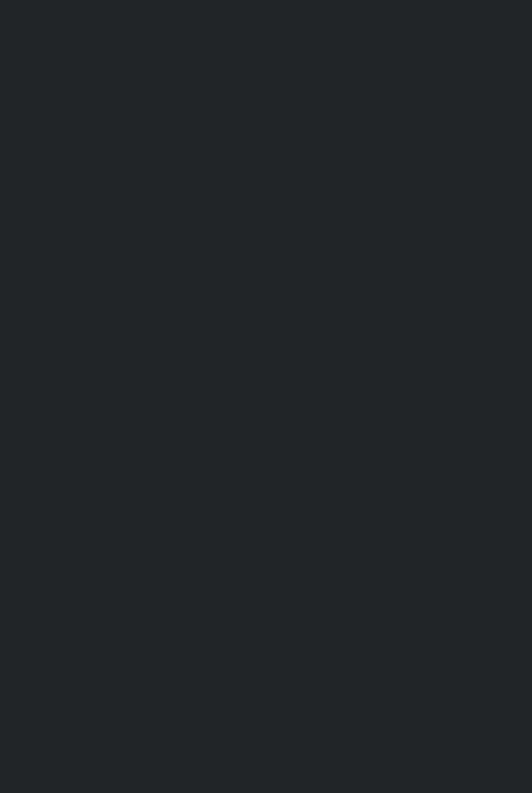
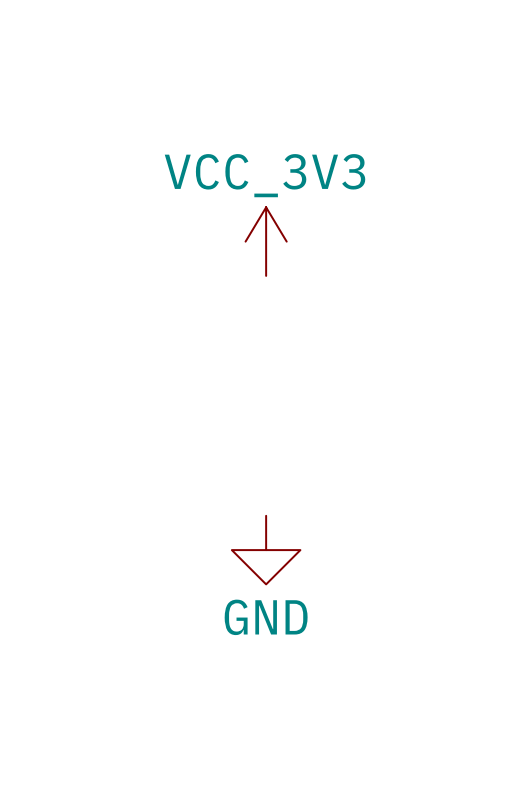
power symbol: none -> VCC_3V3 (266, 241)
power symbol: none -> GND (266, 550)

